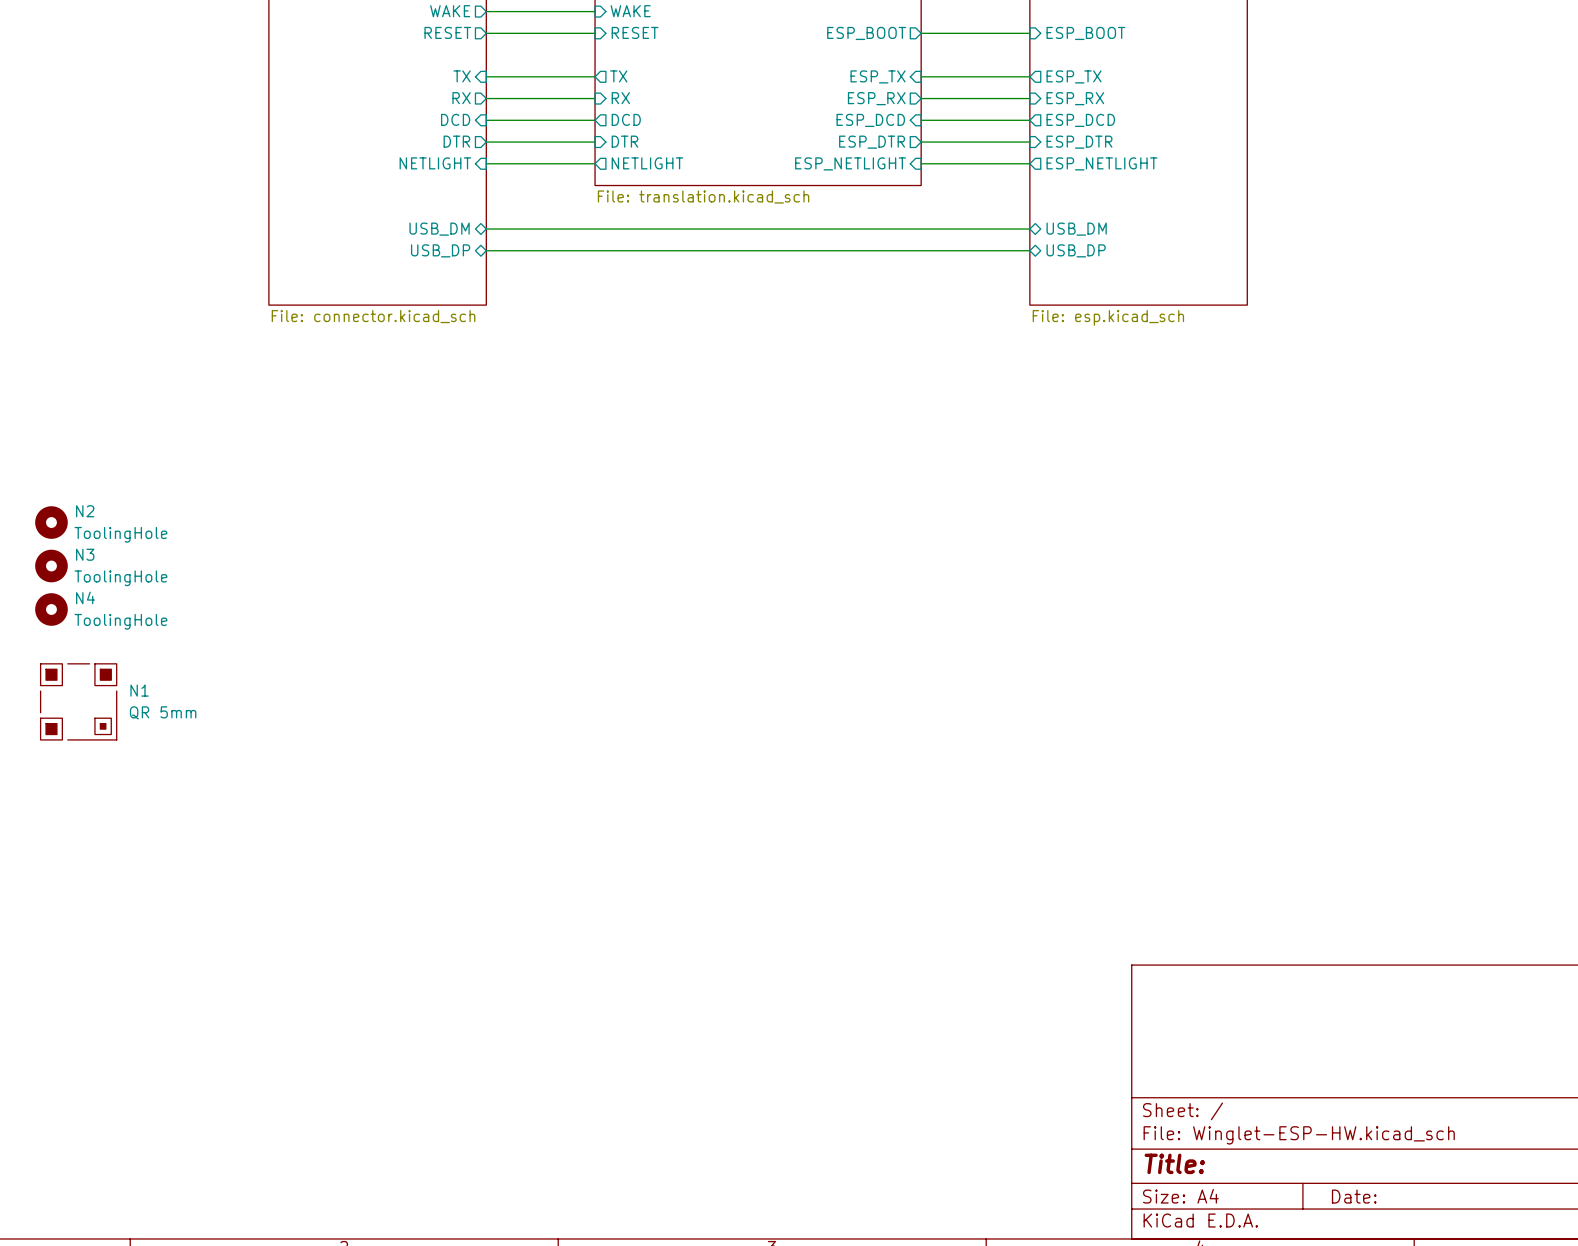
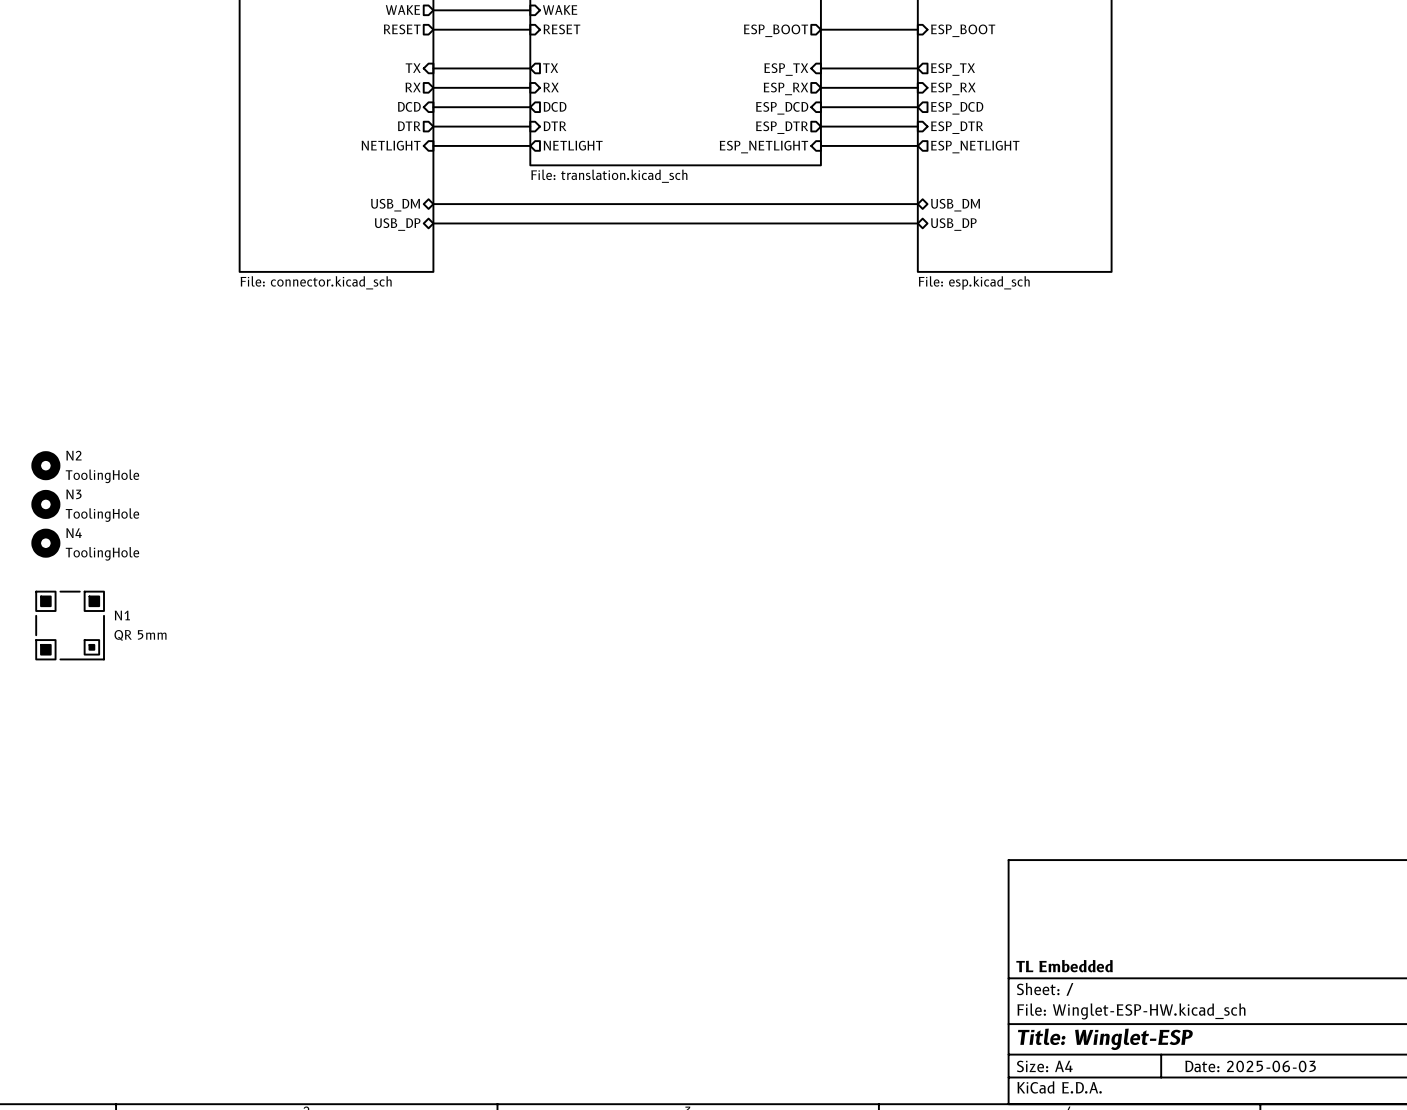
title block: none -> TL Embedded (1064, 966)
title block: Title: (1174, 1163) -> Title: Winglet-ESP (1105, 1039)
title block: Date: (1354, 1196) -> Date: 2025-06-03 (1250, 1066)

